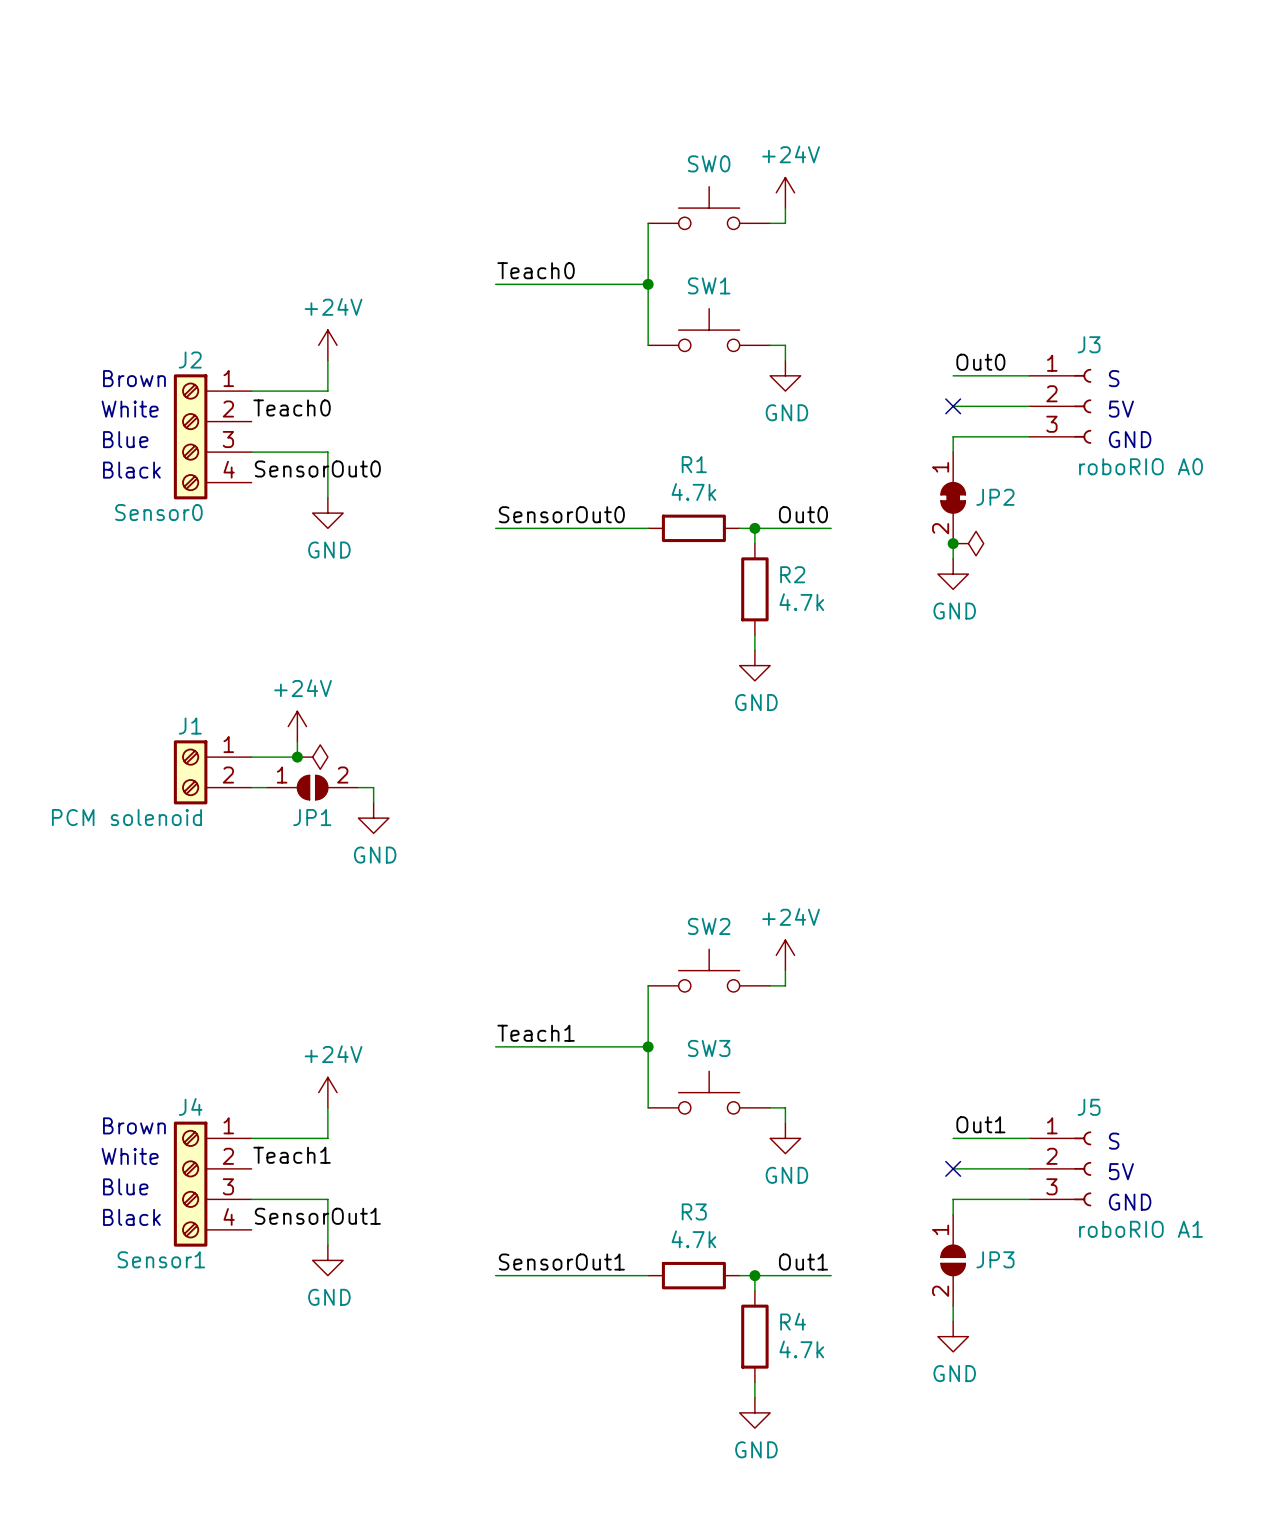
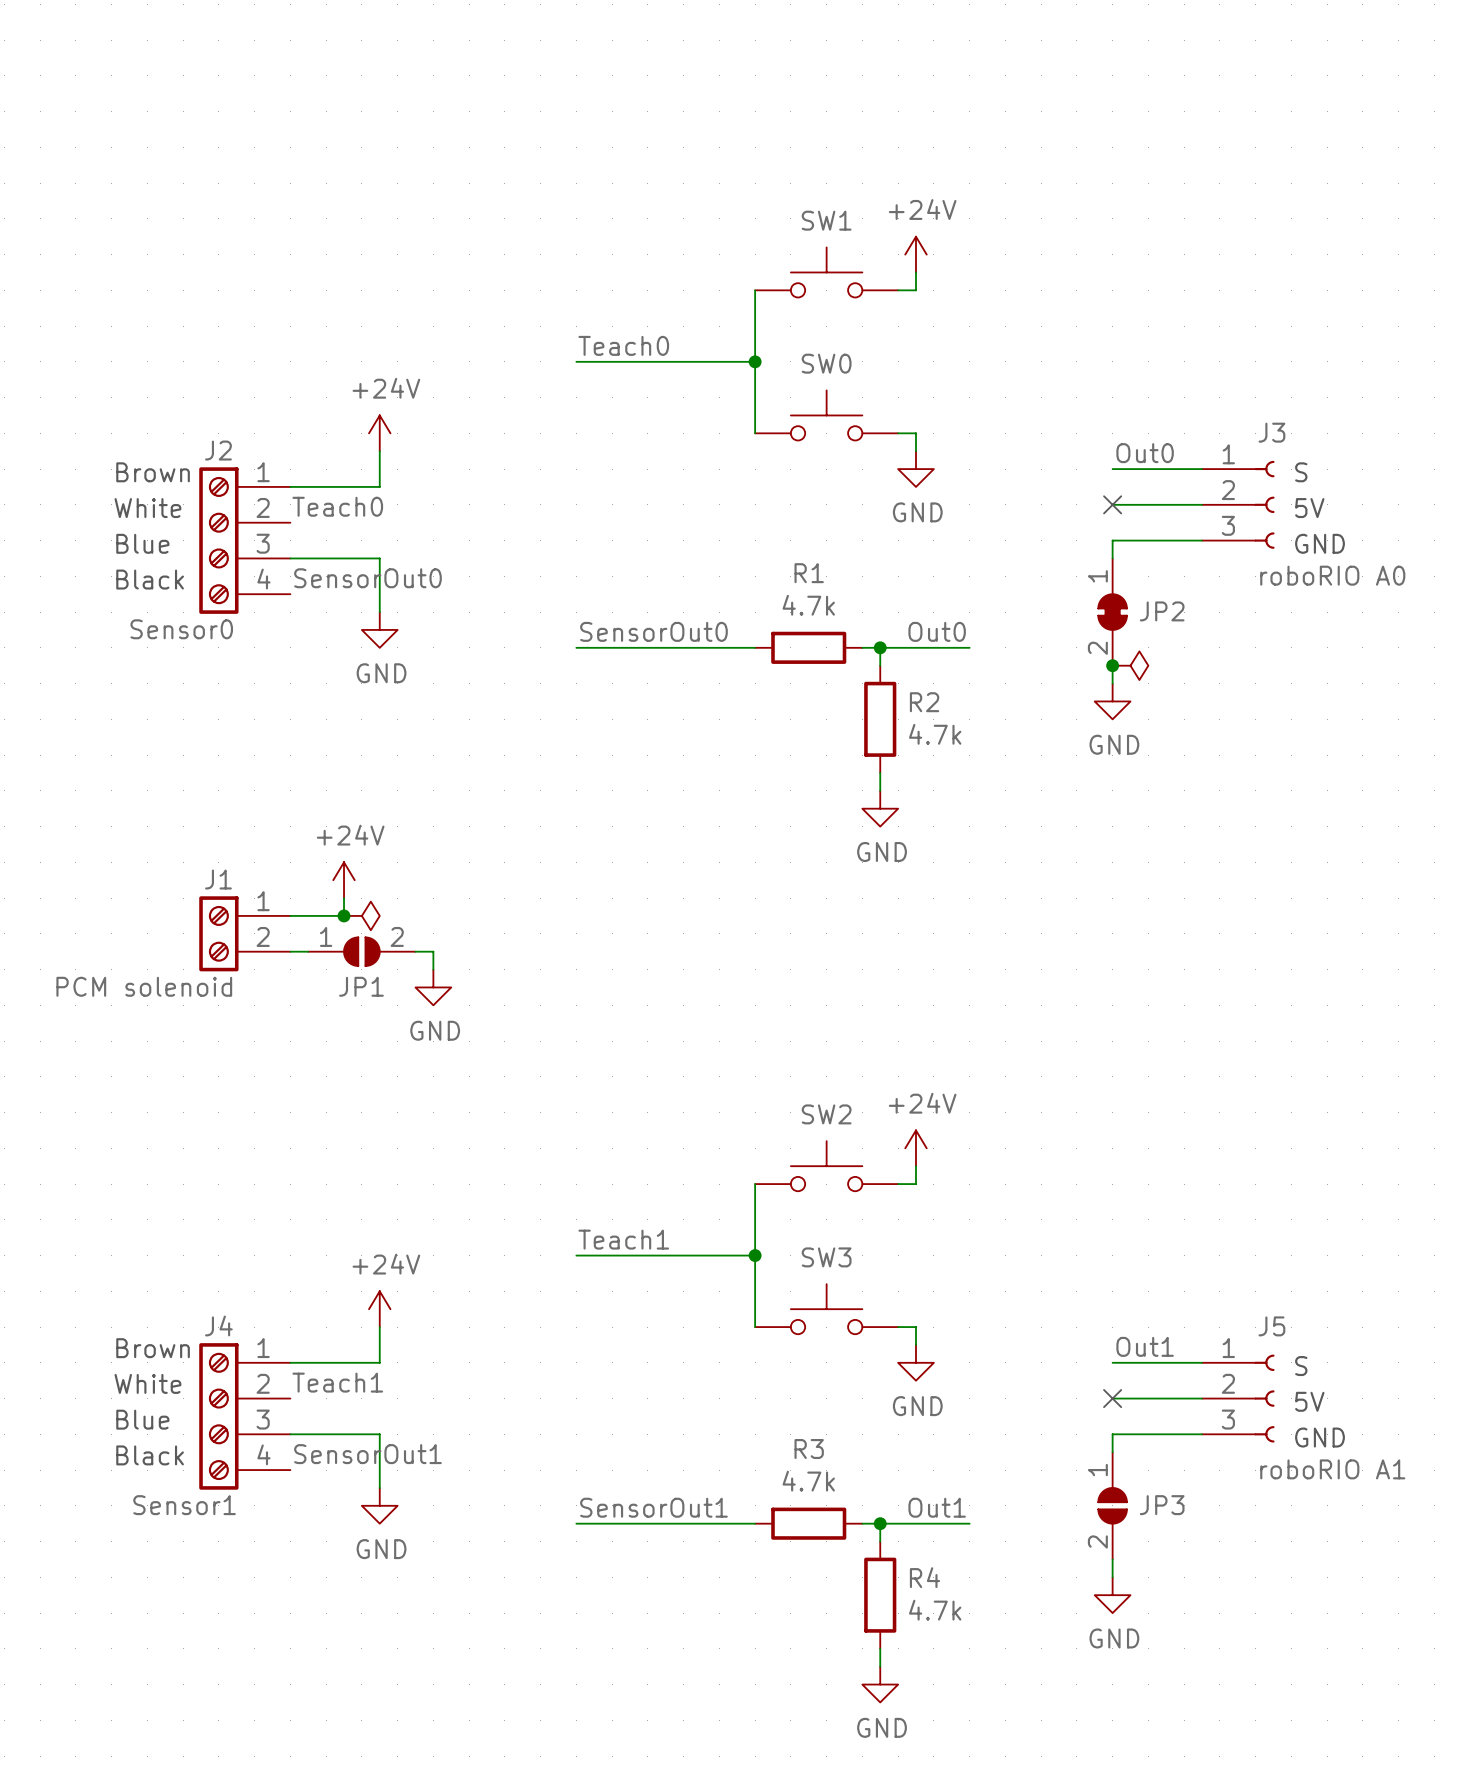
SW0 name: SW0 (709, 163) -> SW1 (826, 220)
SW1 name: SW1 (709, 285) -> SW0 (826, 363)

